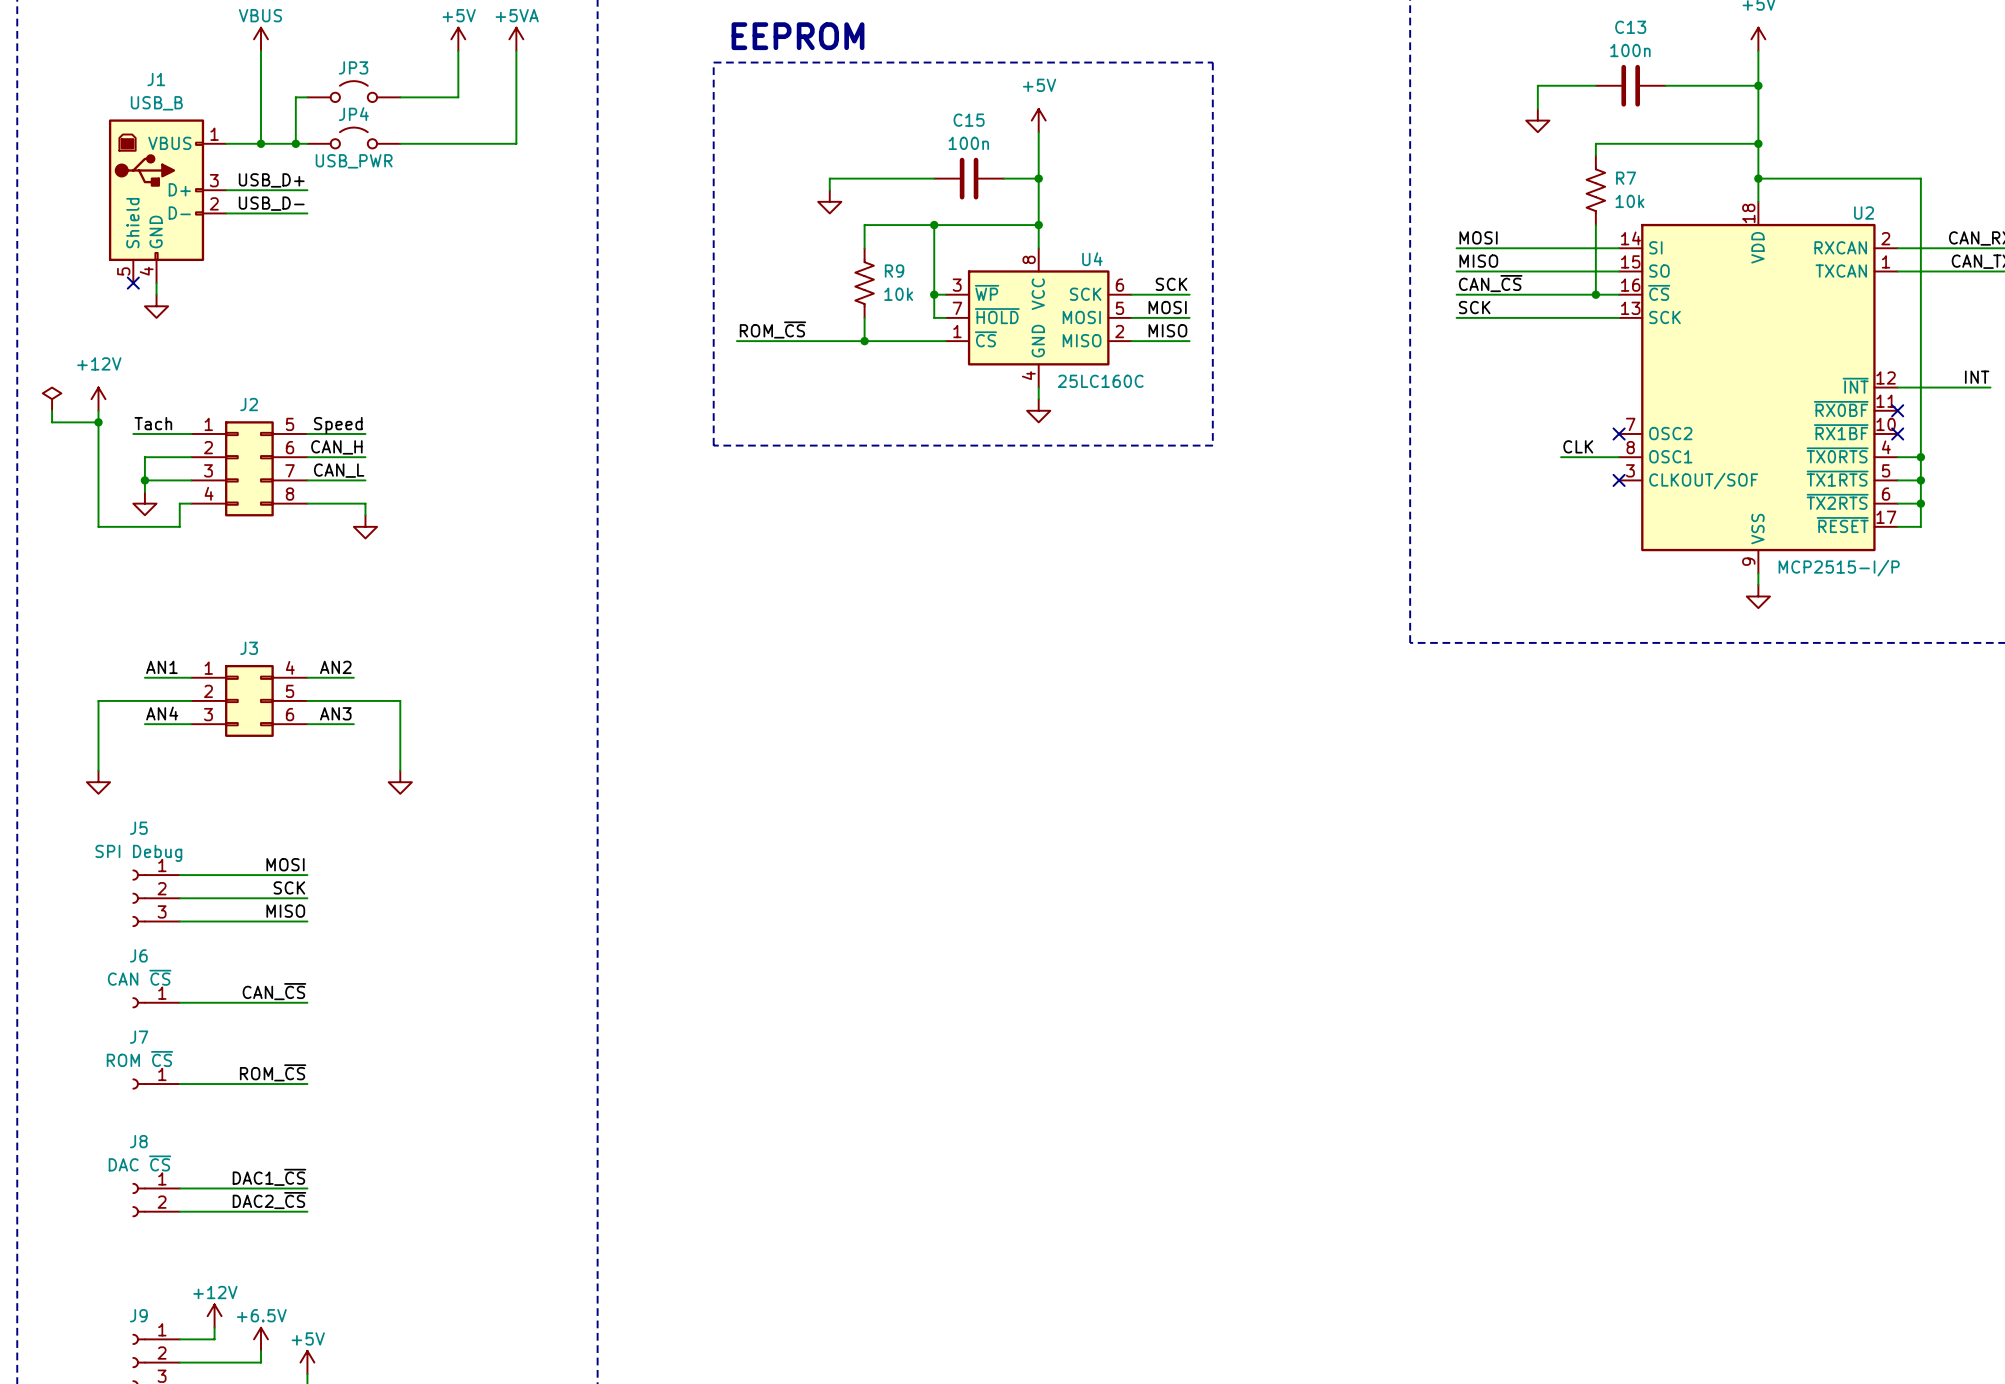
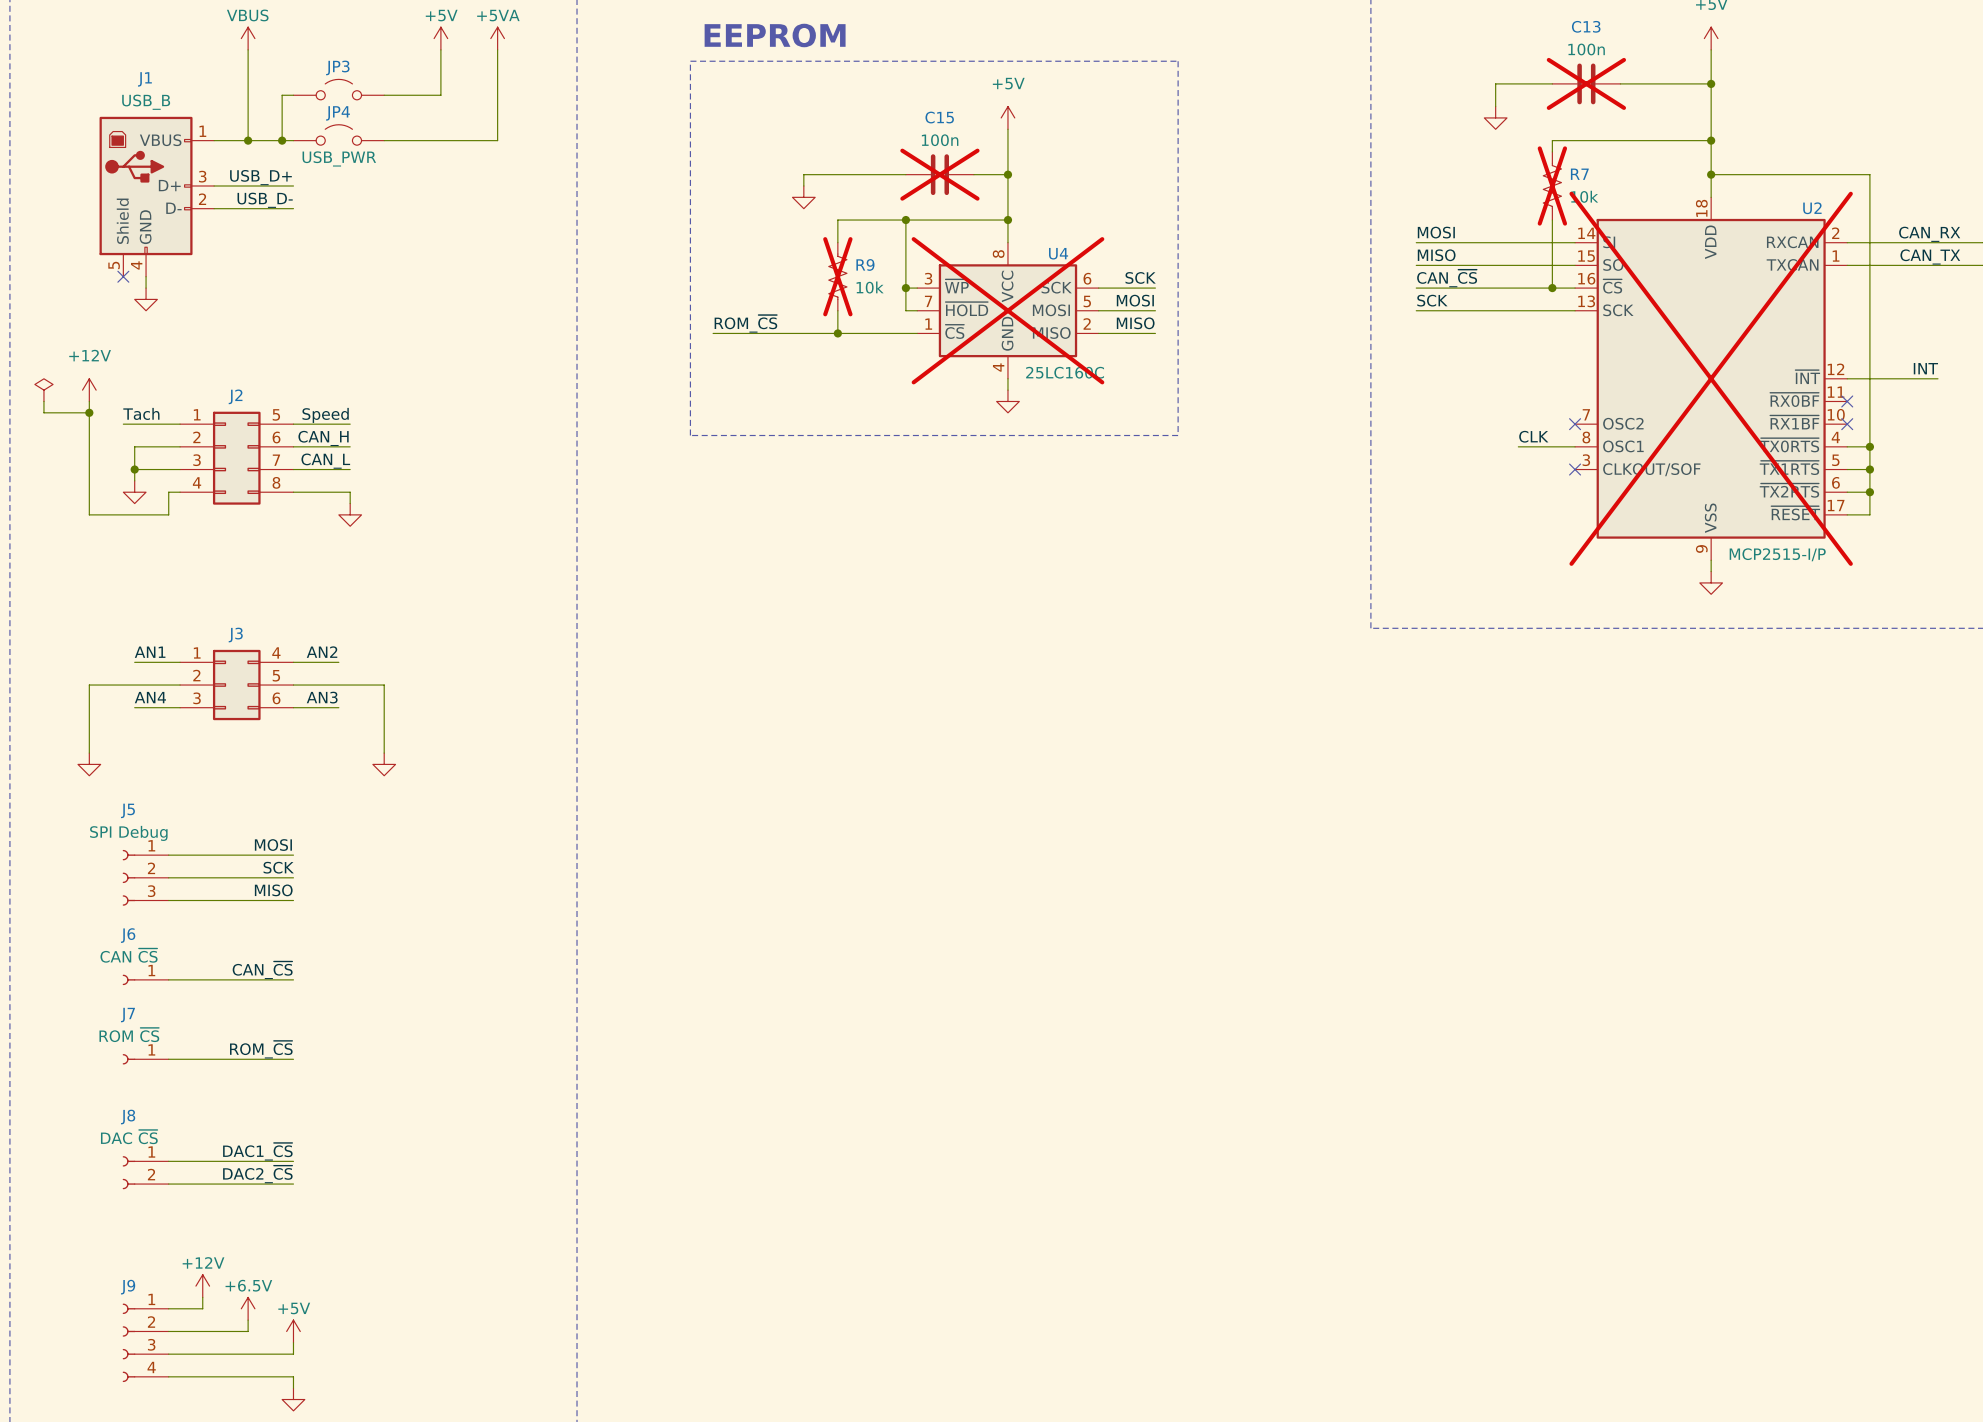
C13 do-not-place cross: none -> (1586, 83)
C15 do-not-place cross: none -> (939, 174)
R7 do-not-place cross: none -> (1552, 185)
R9 do-not-place cross: none -> (837, 276)
U4 do-not-place cross: none -> (1007, 310)
U2 do-not-place cross: none -> (1711, 378)

